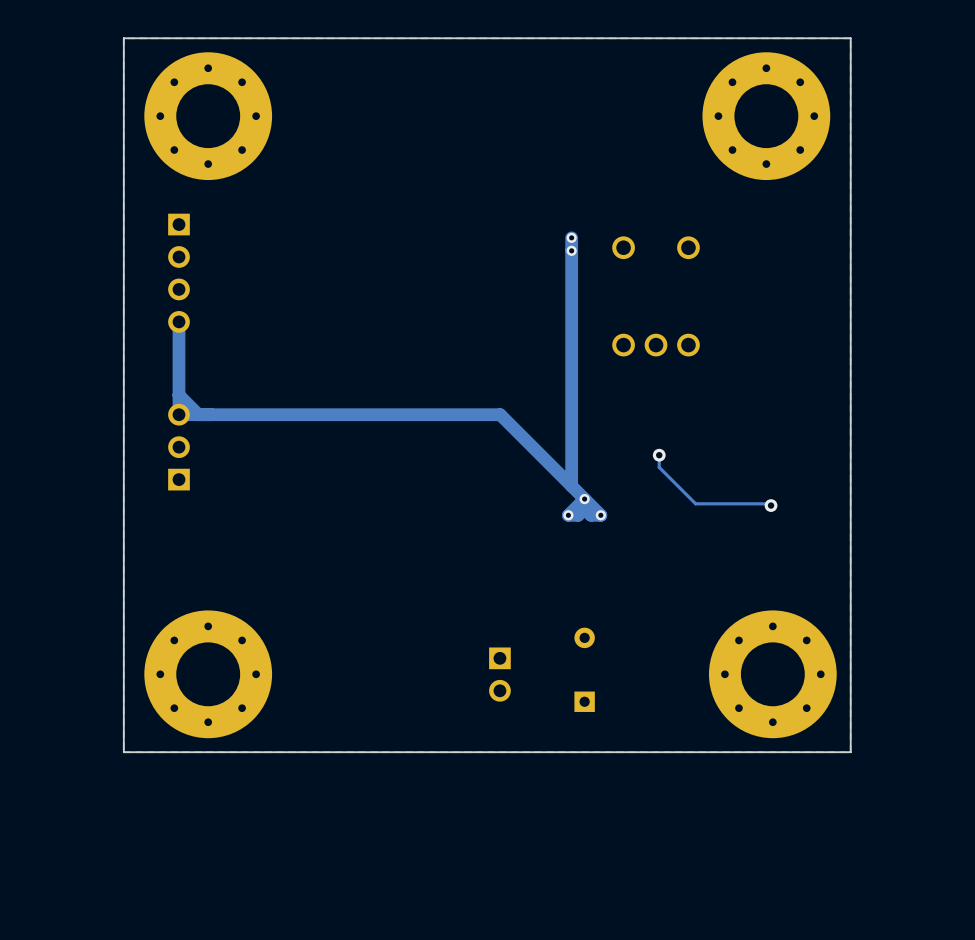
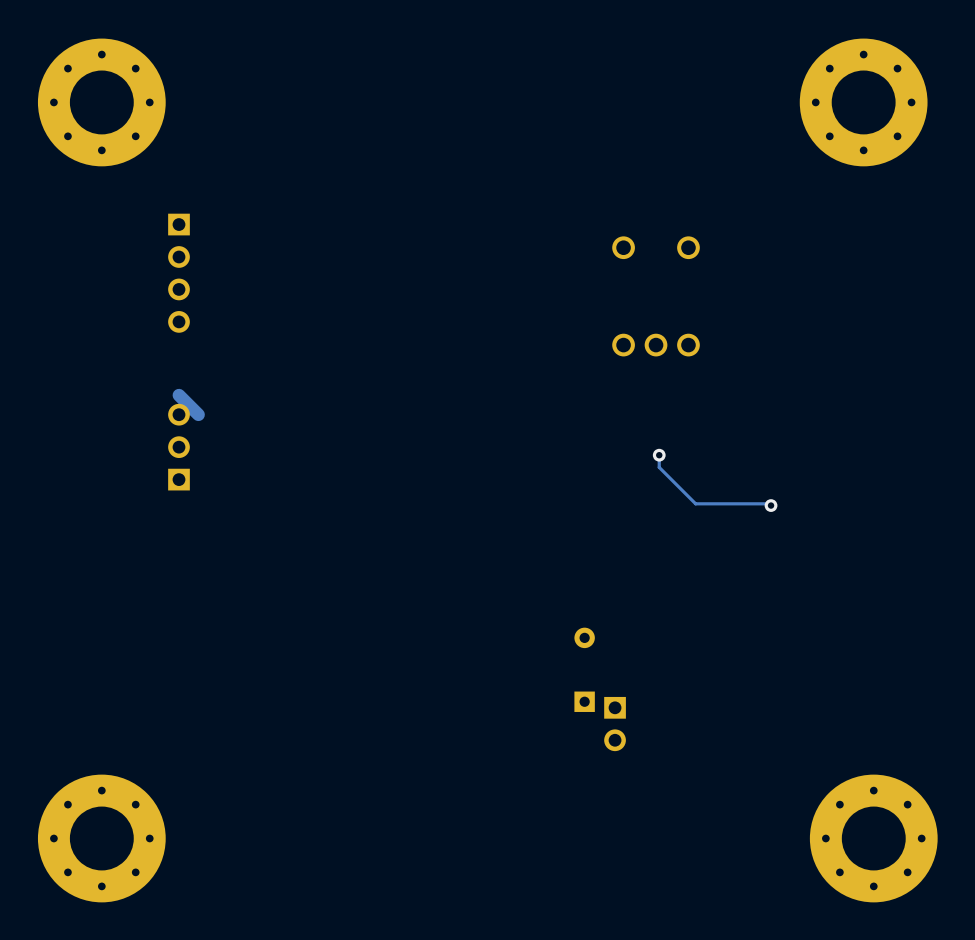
board edge: (850, 38) (123, 38) (123, 752) (850, 752) (850, 38) -> none
part position: (208, 116) -> (101, 102)
part position: (766, 116) -> (863, 102)
track: (571, 237) (571, 486) -> none
via: (571, 237) -> none
via: (571, 250) -> none
track: (179, 321) (179, 414) (500, 414) (600, 515) (591, 515) (584, 508) (578, 515) (568, 515) (584, 499) -> none
via: (584, 499) -> none
via: (568, 515) -> none
via: (600, 515) -> none
part position: (208, 674) -> (101, 838)
part position: (499, 674) -> (615, 724)
part position: (772, 674) -> (873, 838)

